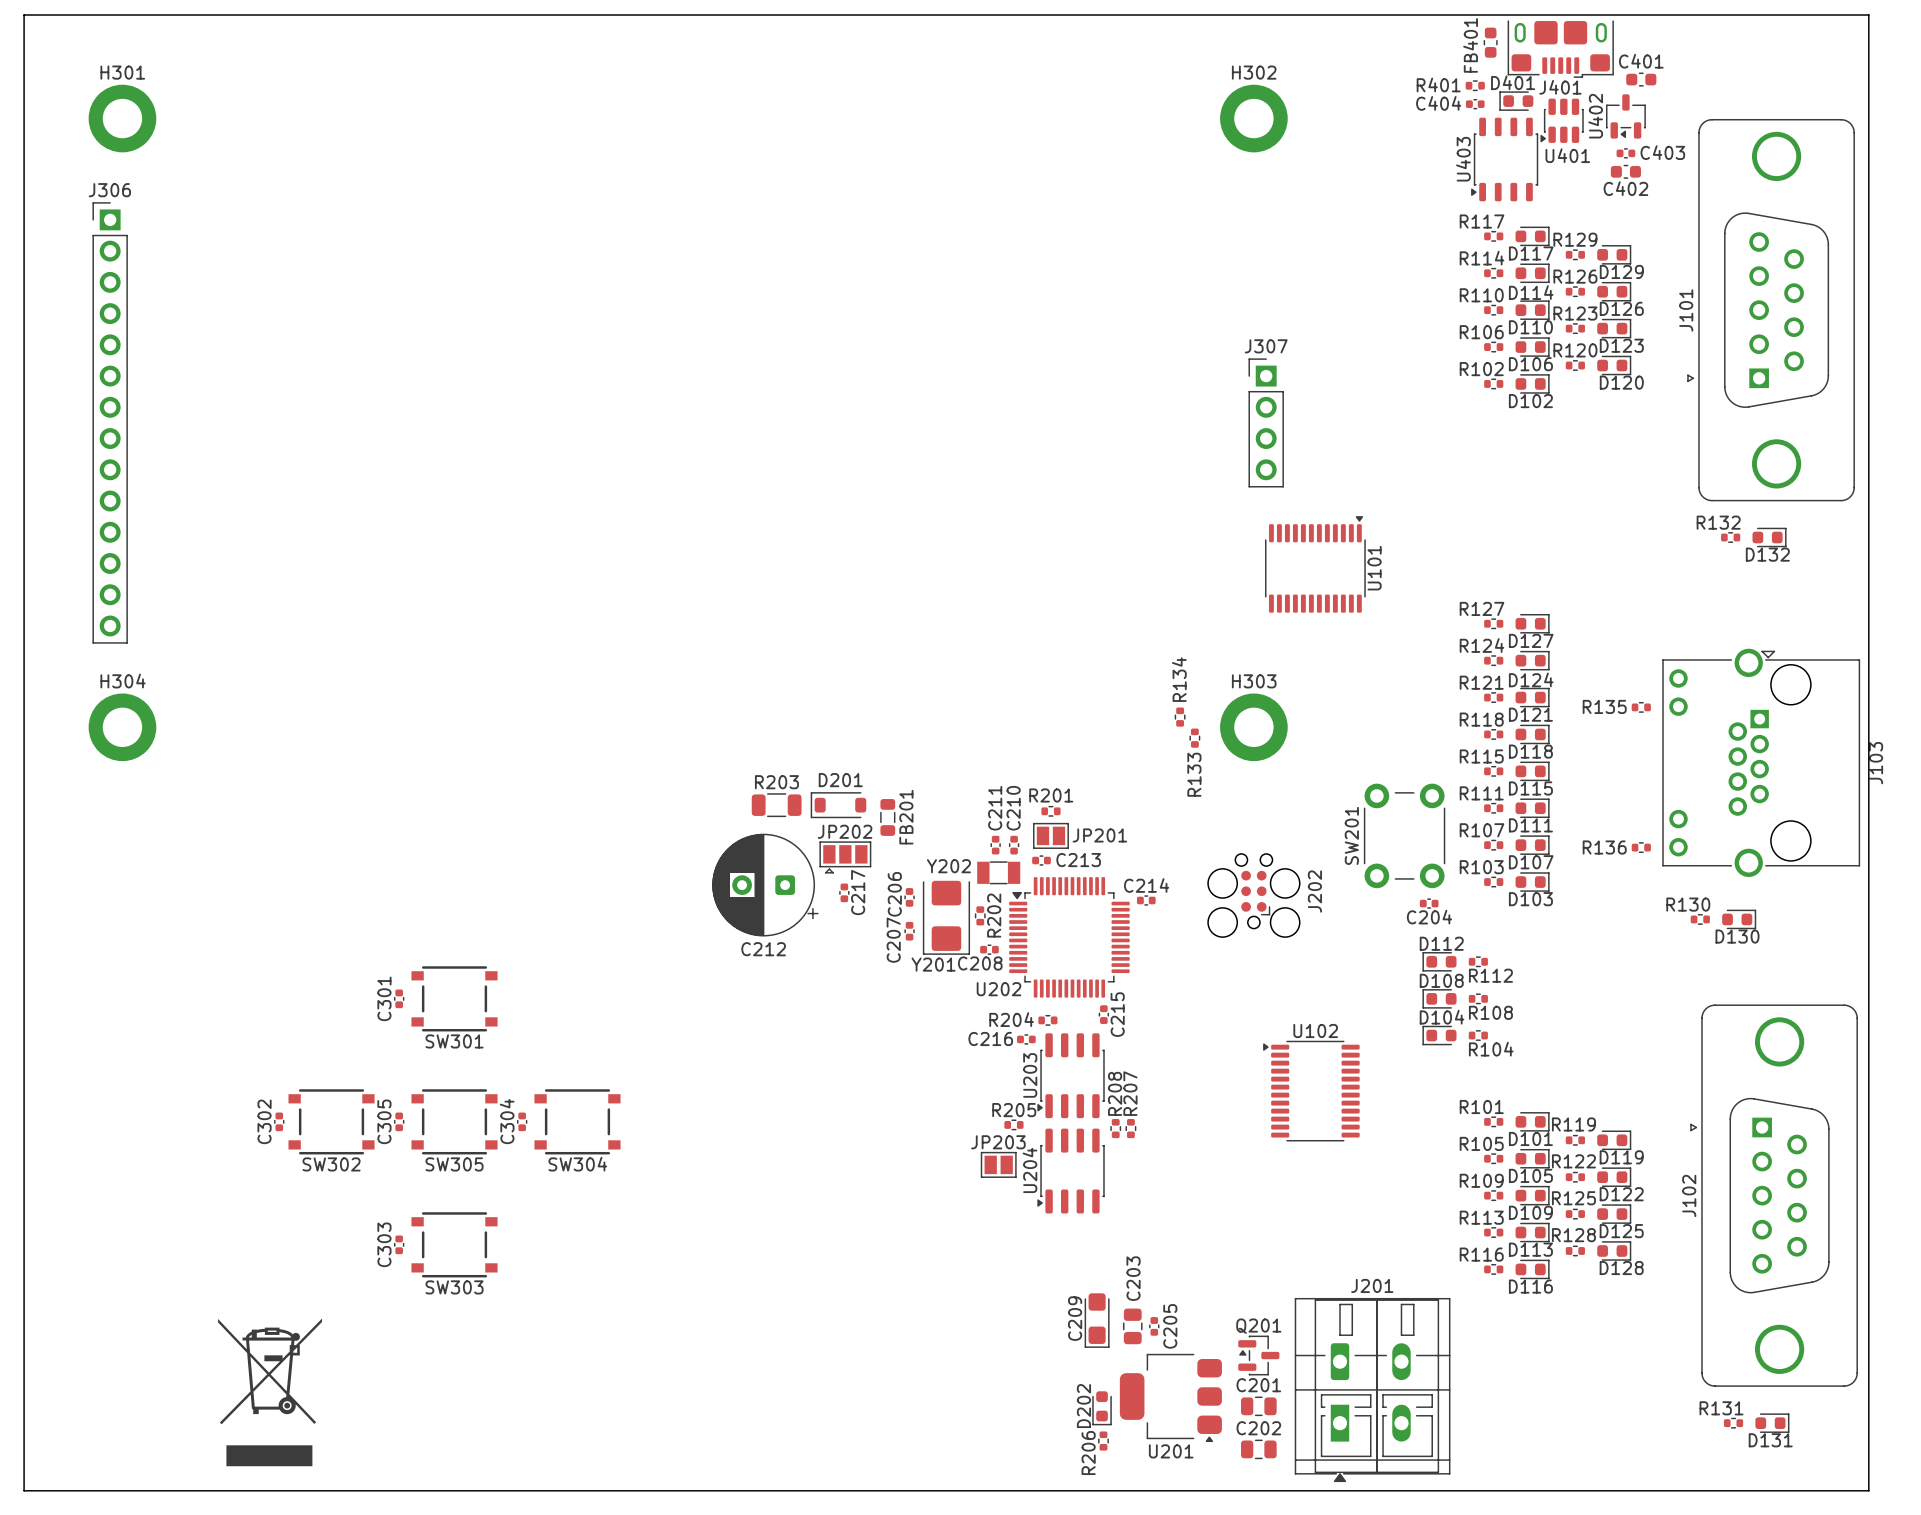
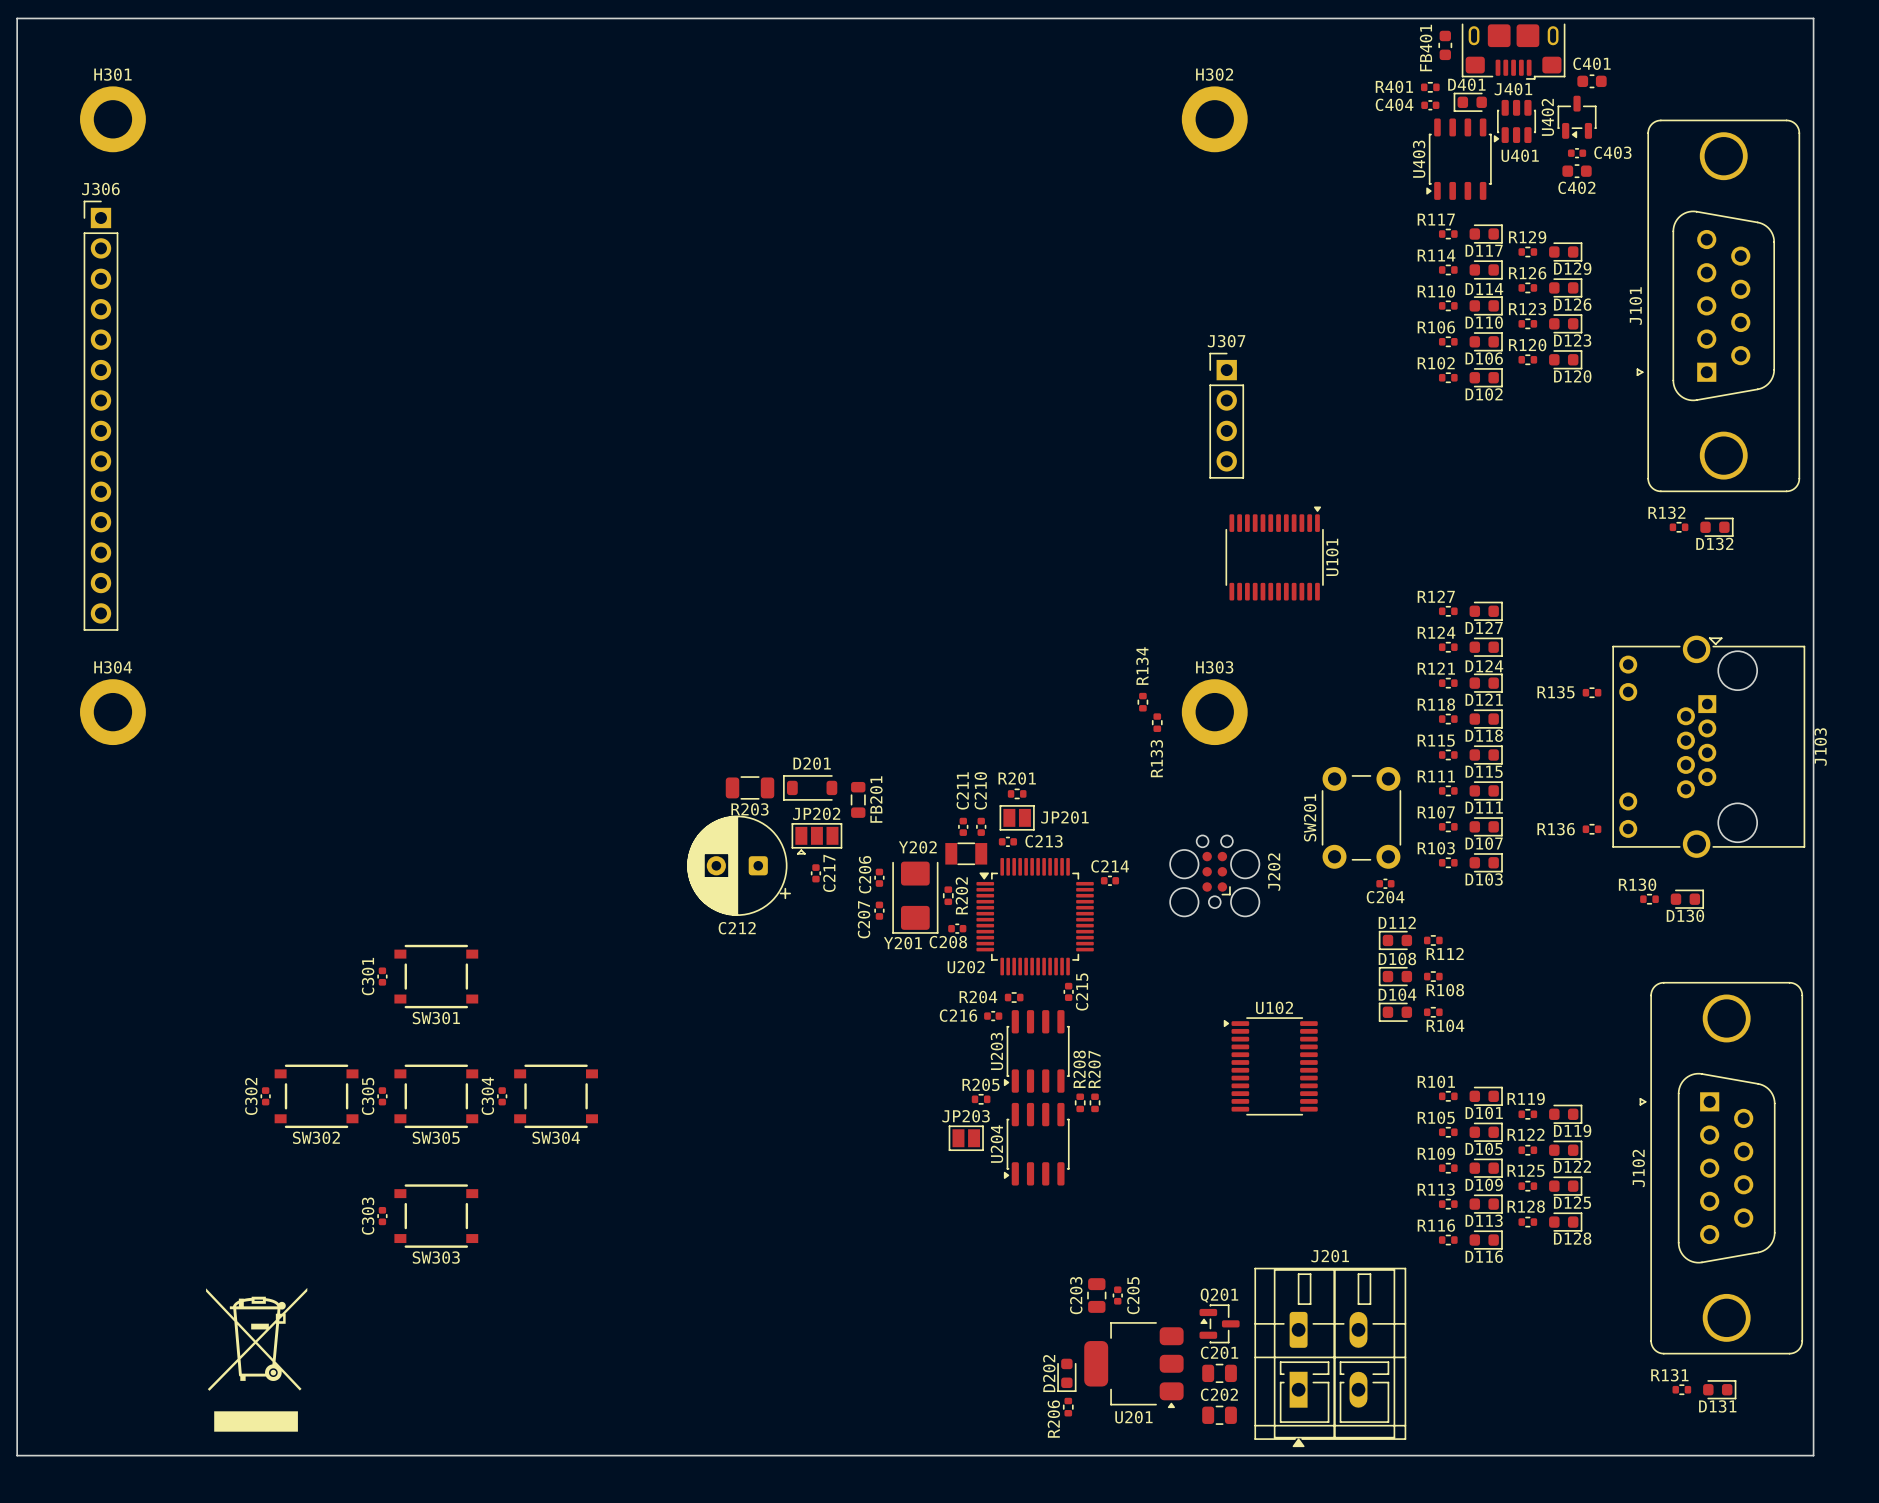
R203 name position: R203 (776, 782) -> R203 (749, 809)
C203 name position: C203 (1133, 1278) -> C203 (1076, 1295)
C209: (1097, 1320) -> none

